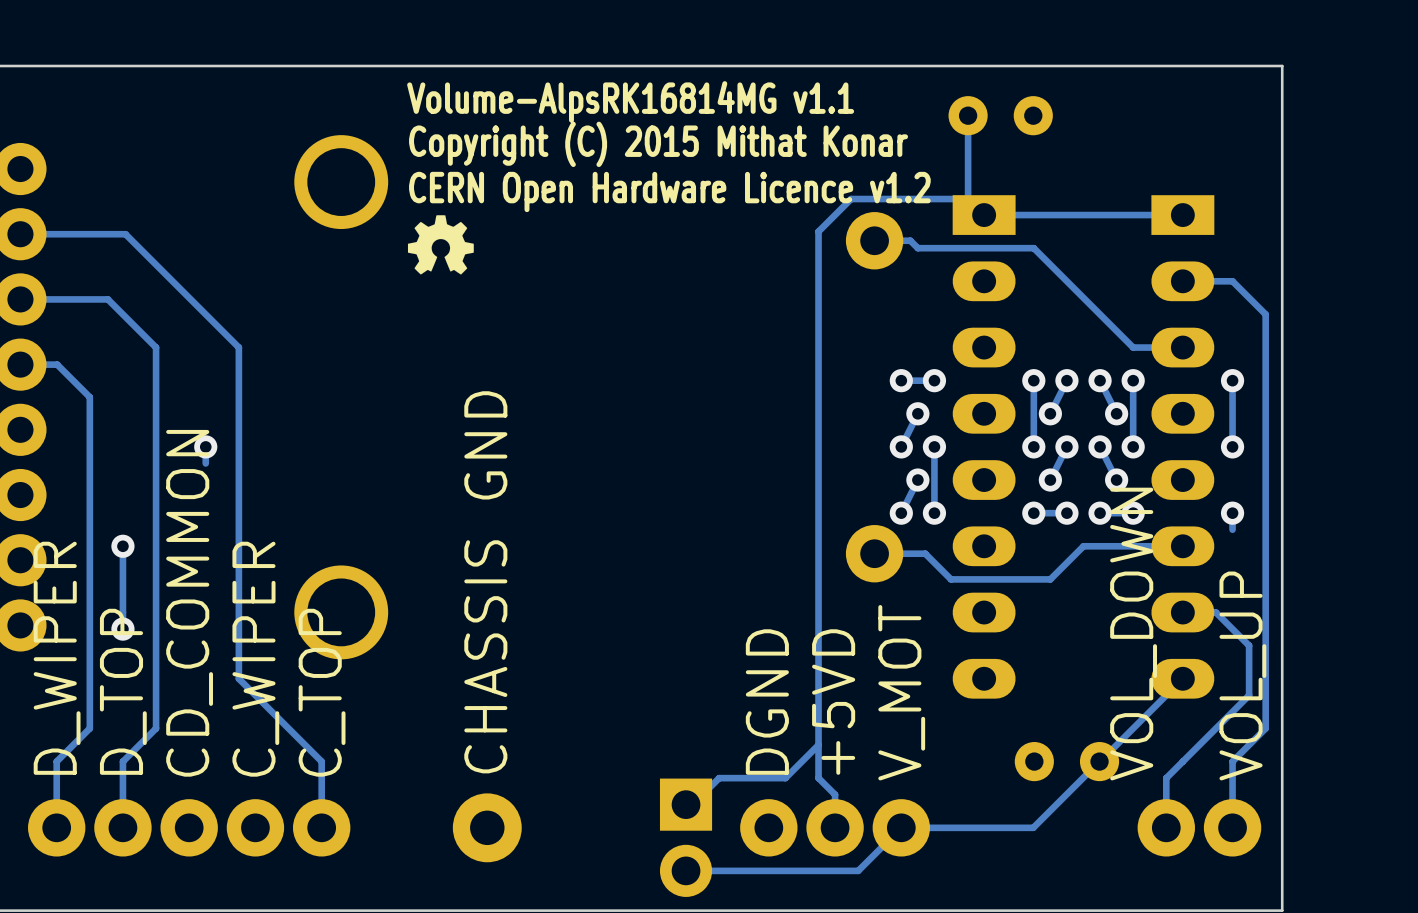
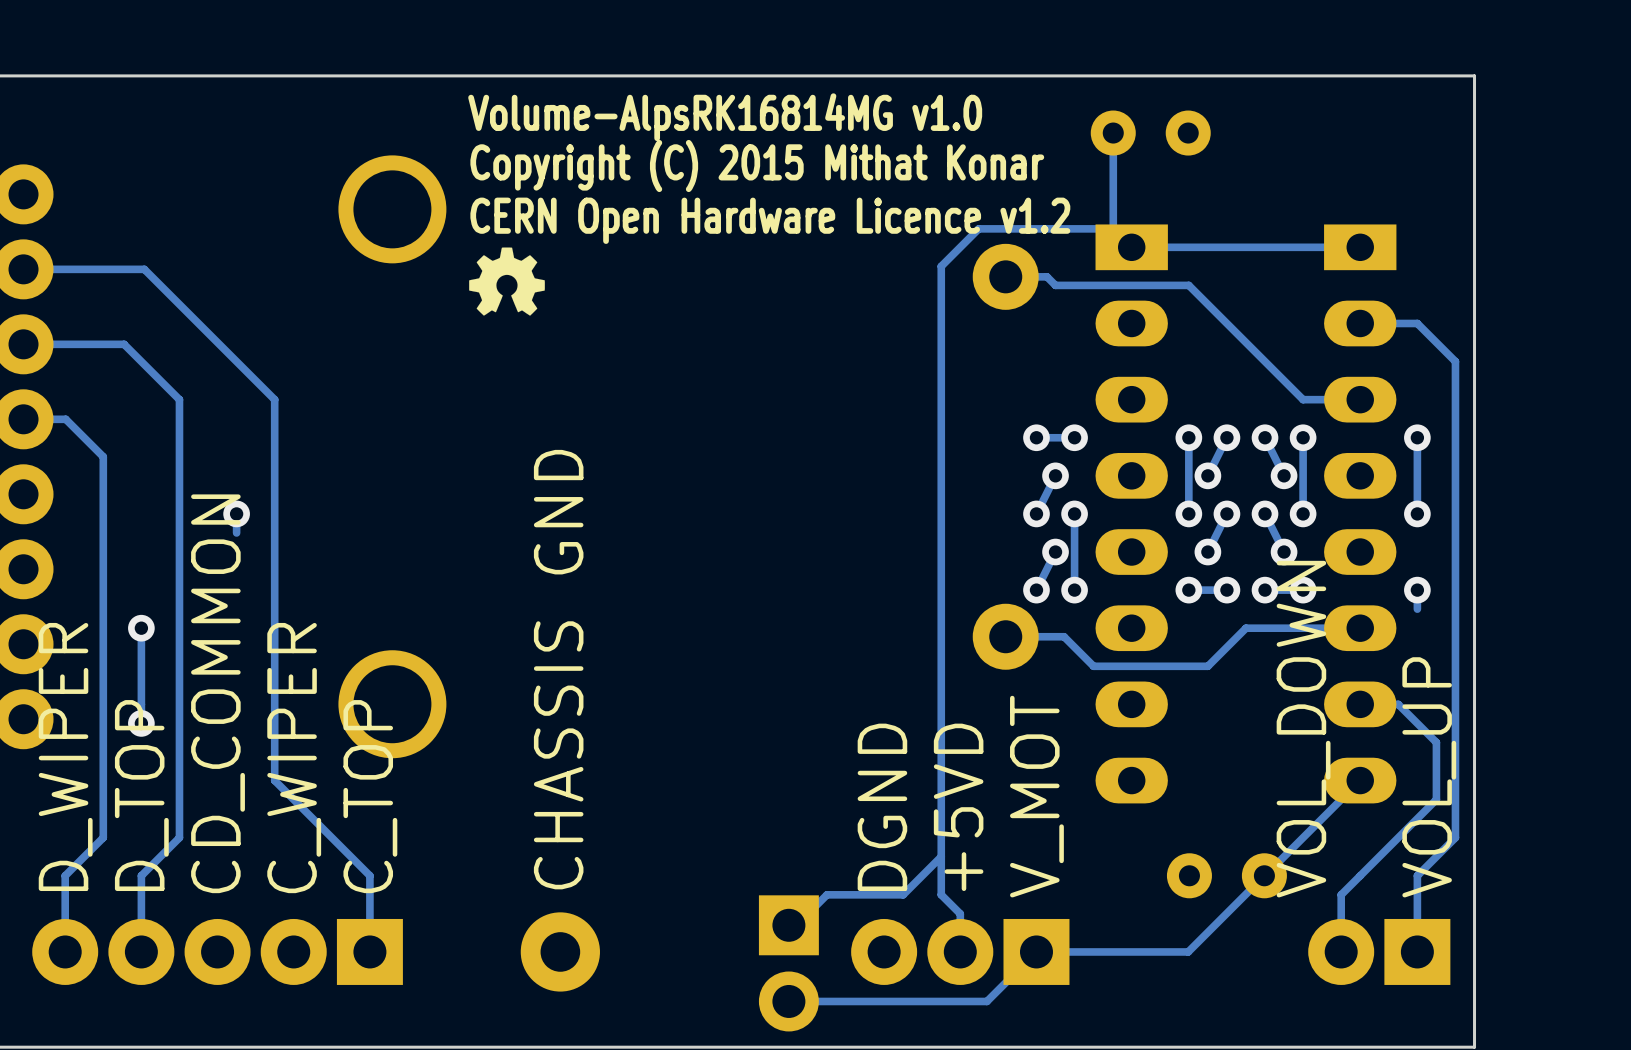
text: Volume-AlpsRK16814MG v1.1 (630, 101) -> Volume-AlpsRK16814MG v1.0 (725, 117)
part footprint: [28, 799, 351, 857] -> [32, 918, 403, 985]
part footprint: [740, 799, 931, 857] -> [851, 918, 1070, 985]
part footprint: [1137, 799, 1262, 857] -> [1308, 918, 1451, 985]

